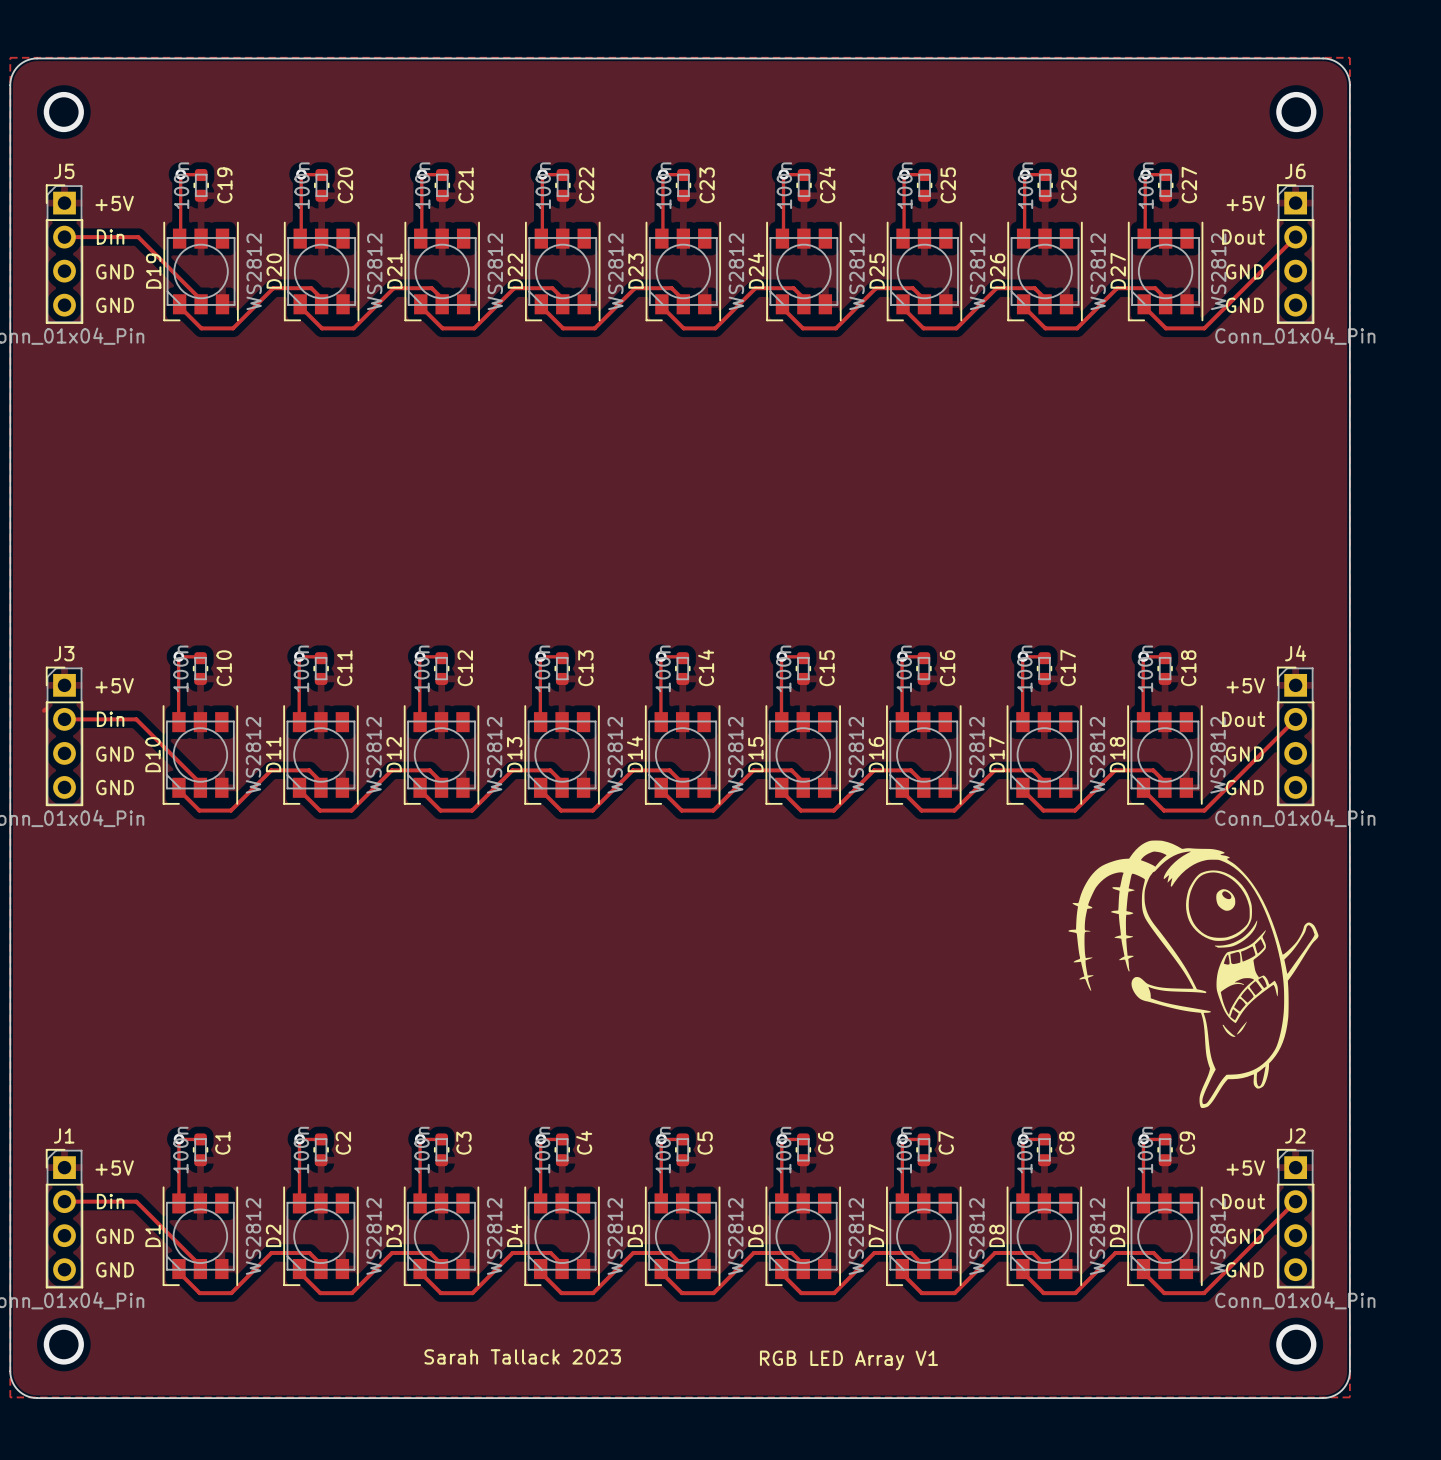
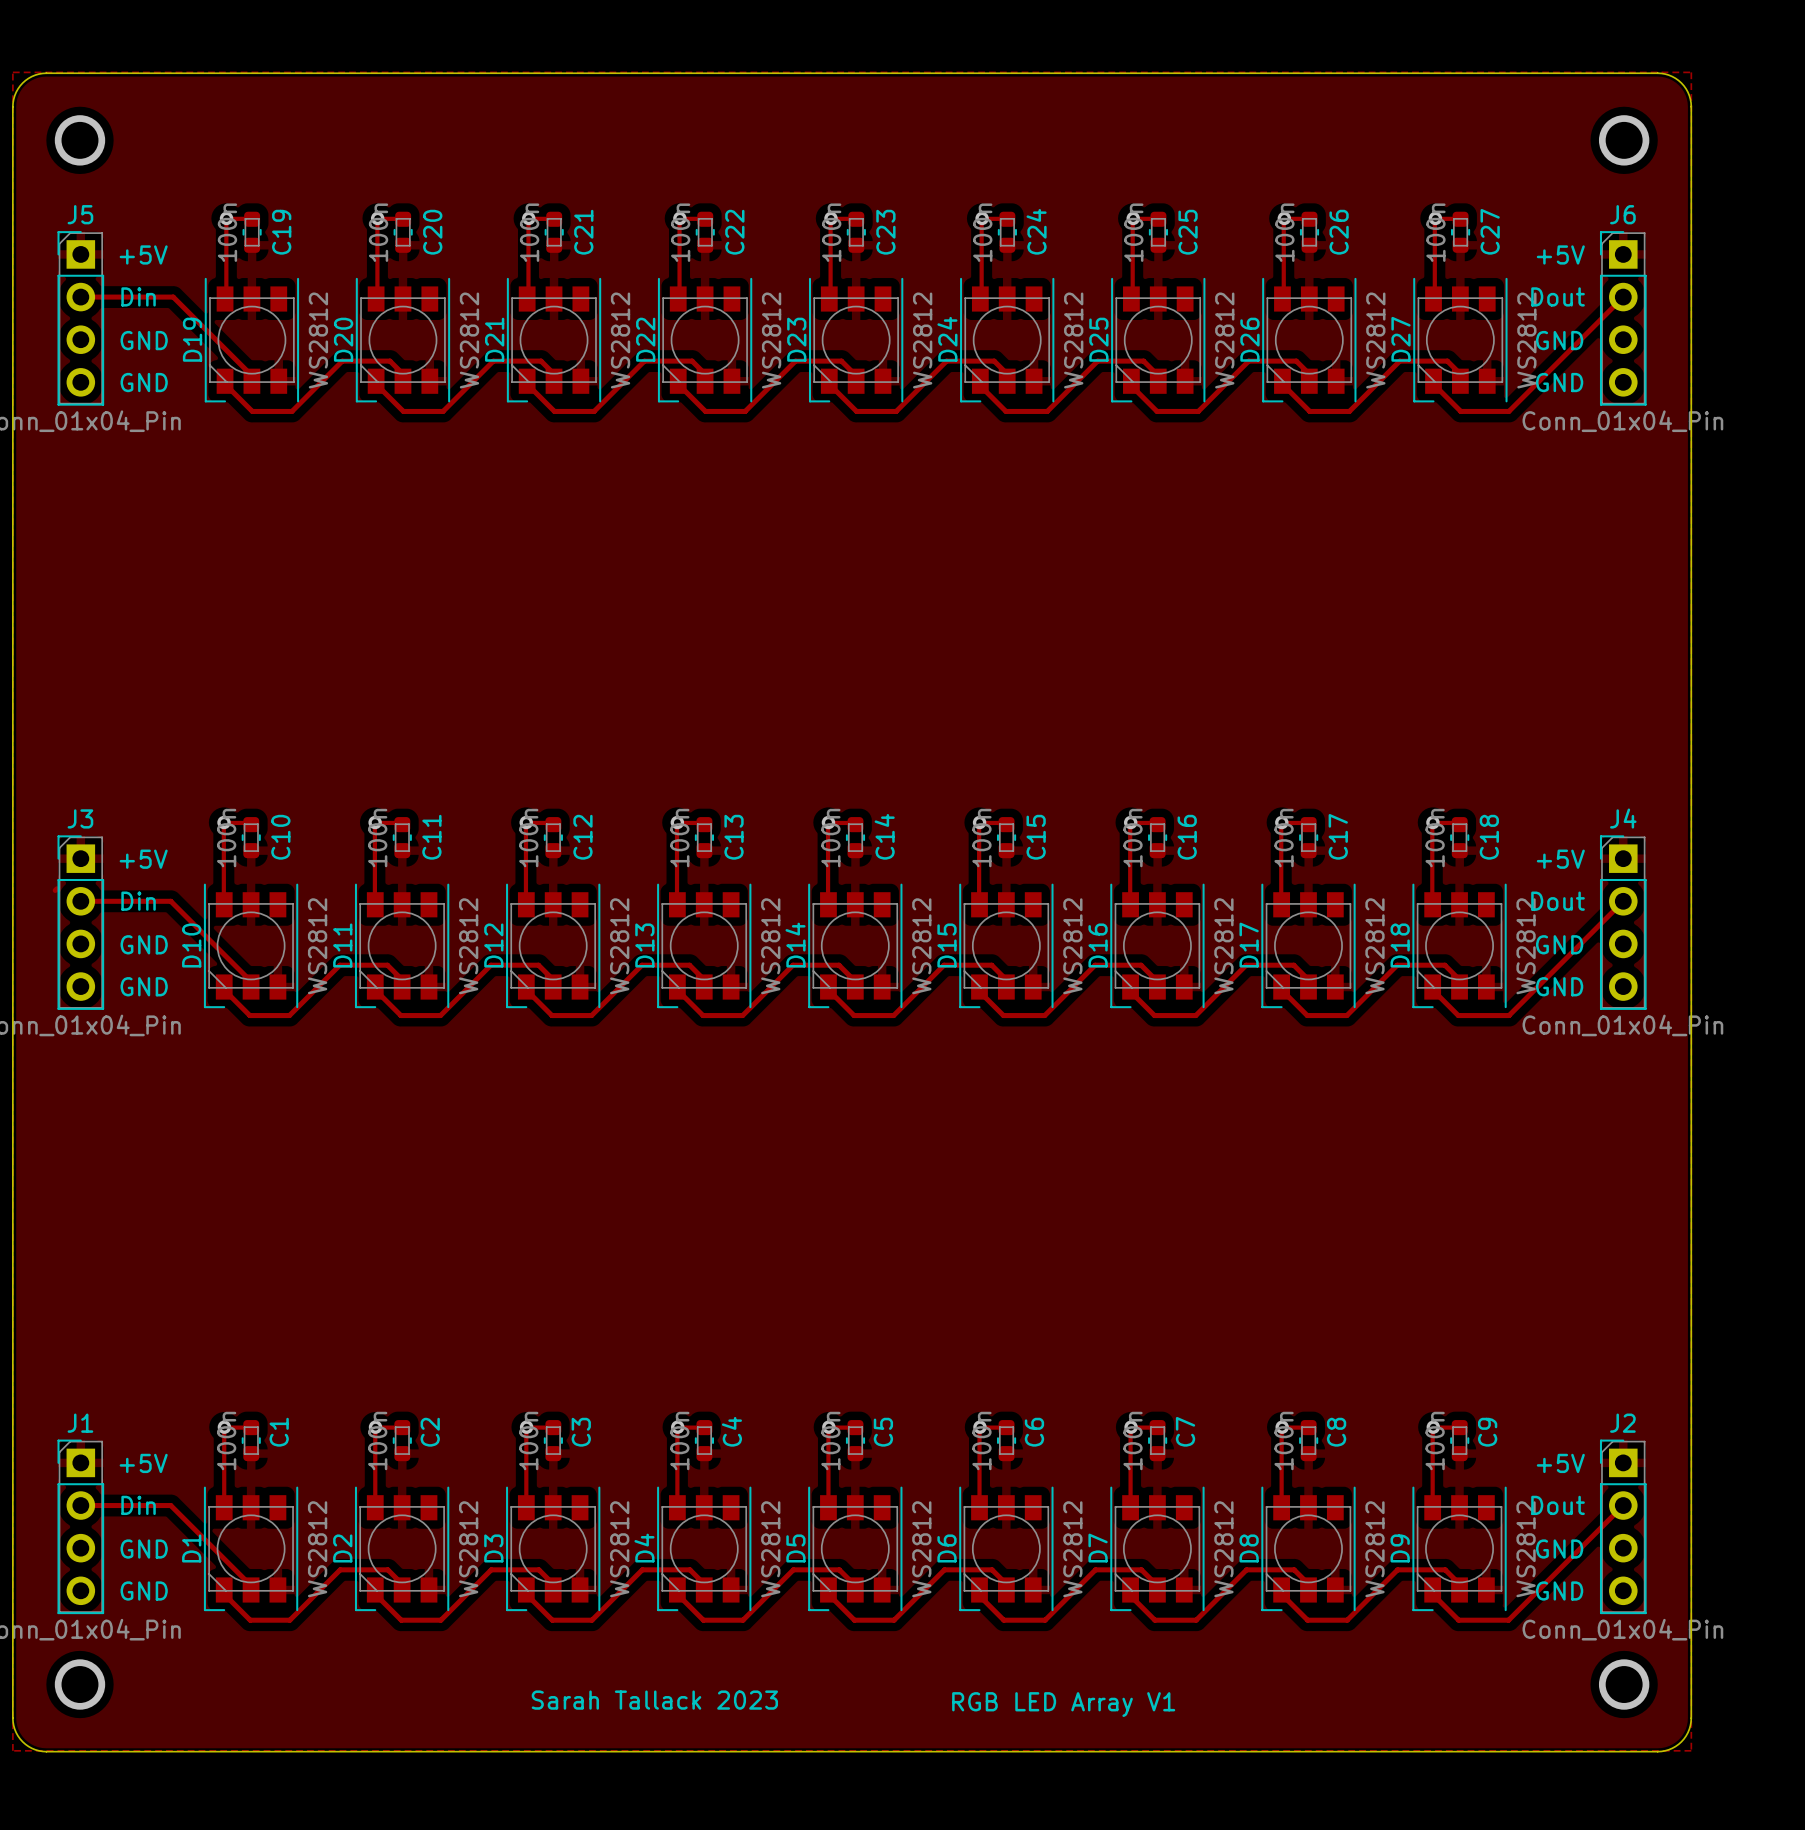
drawing: [1068, 840, 1319, 1109] -> none

